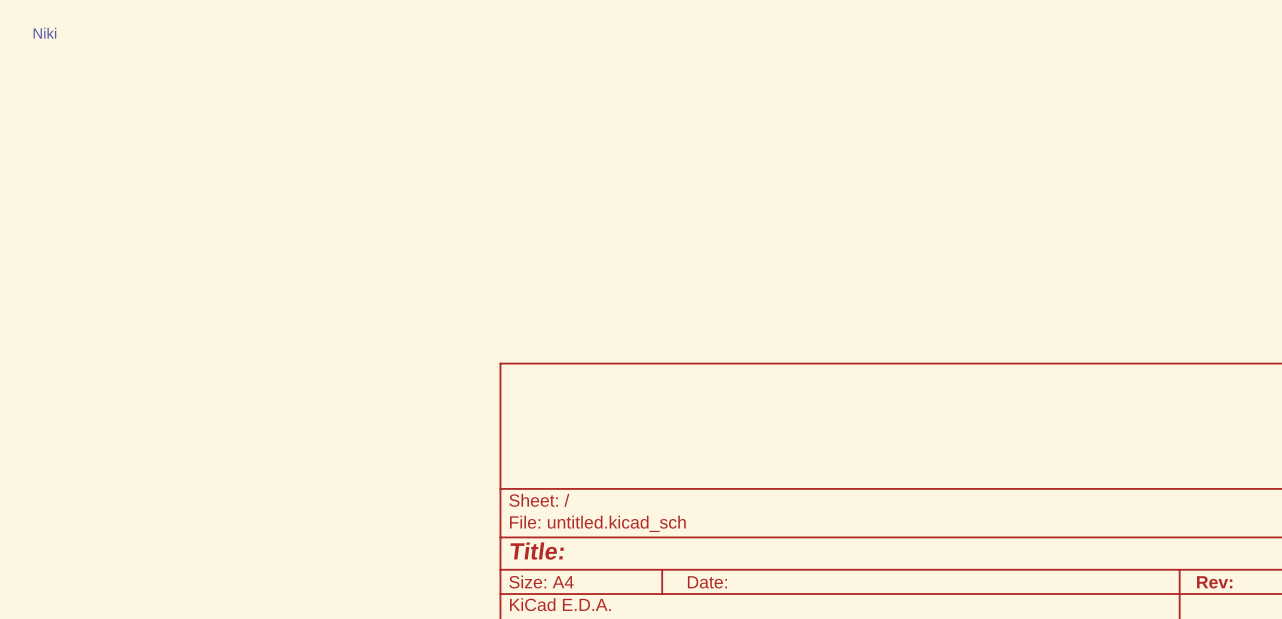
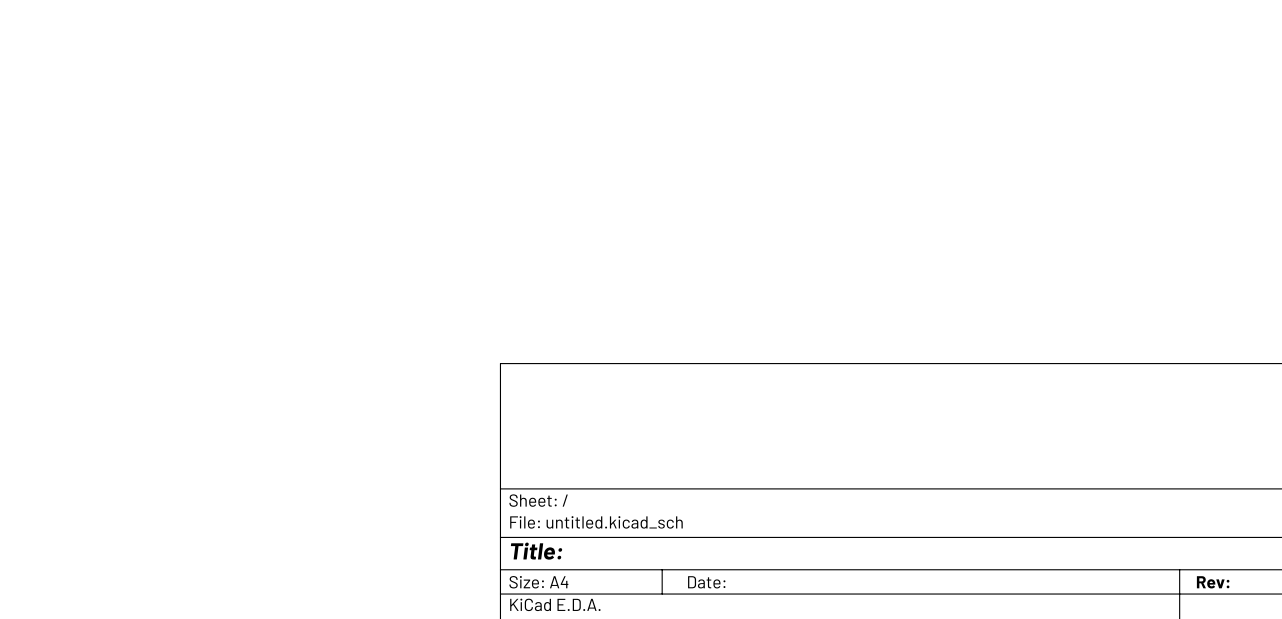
text: Niki (44, 33) -> none

